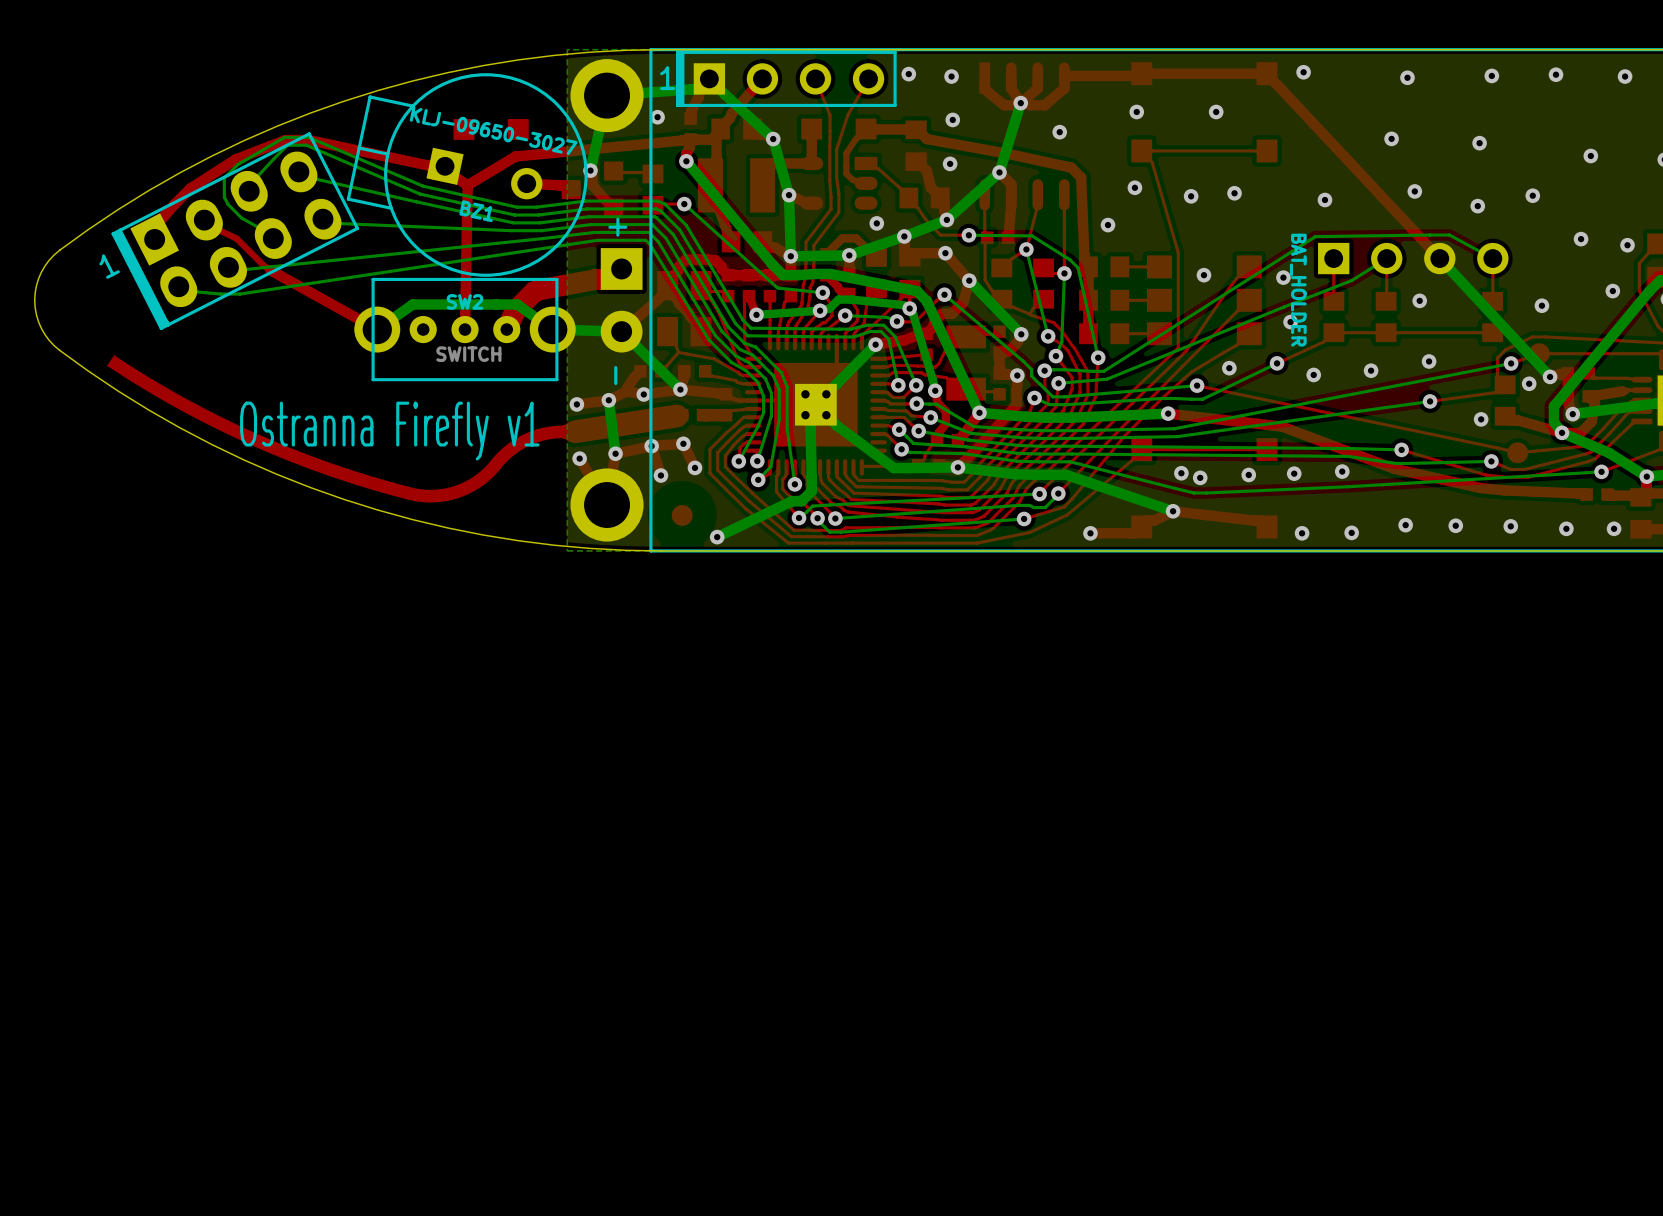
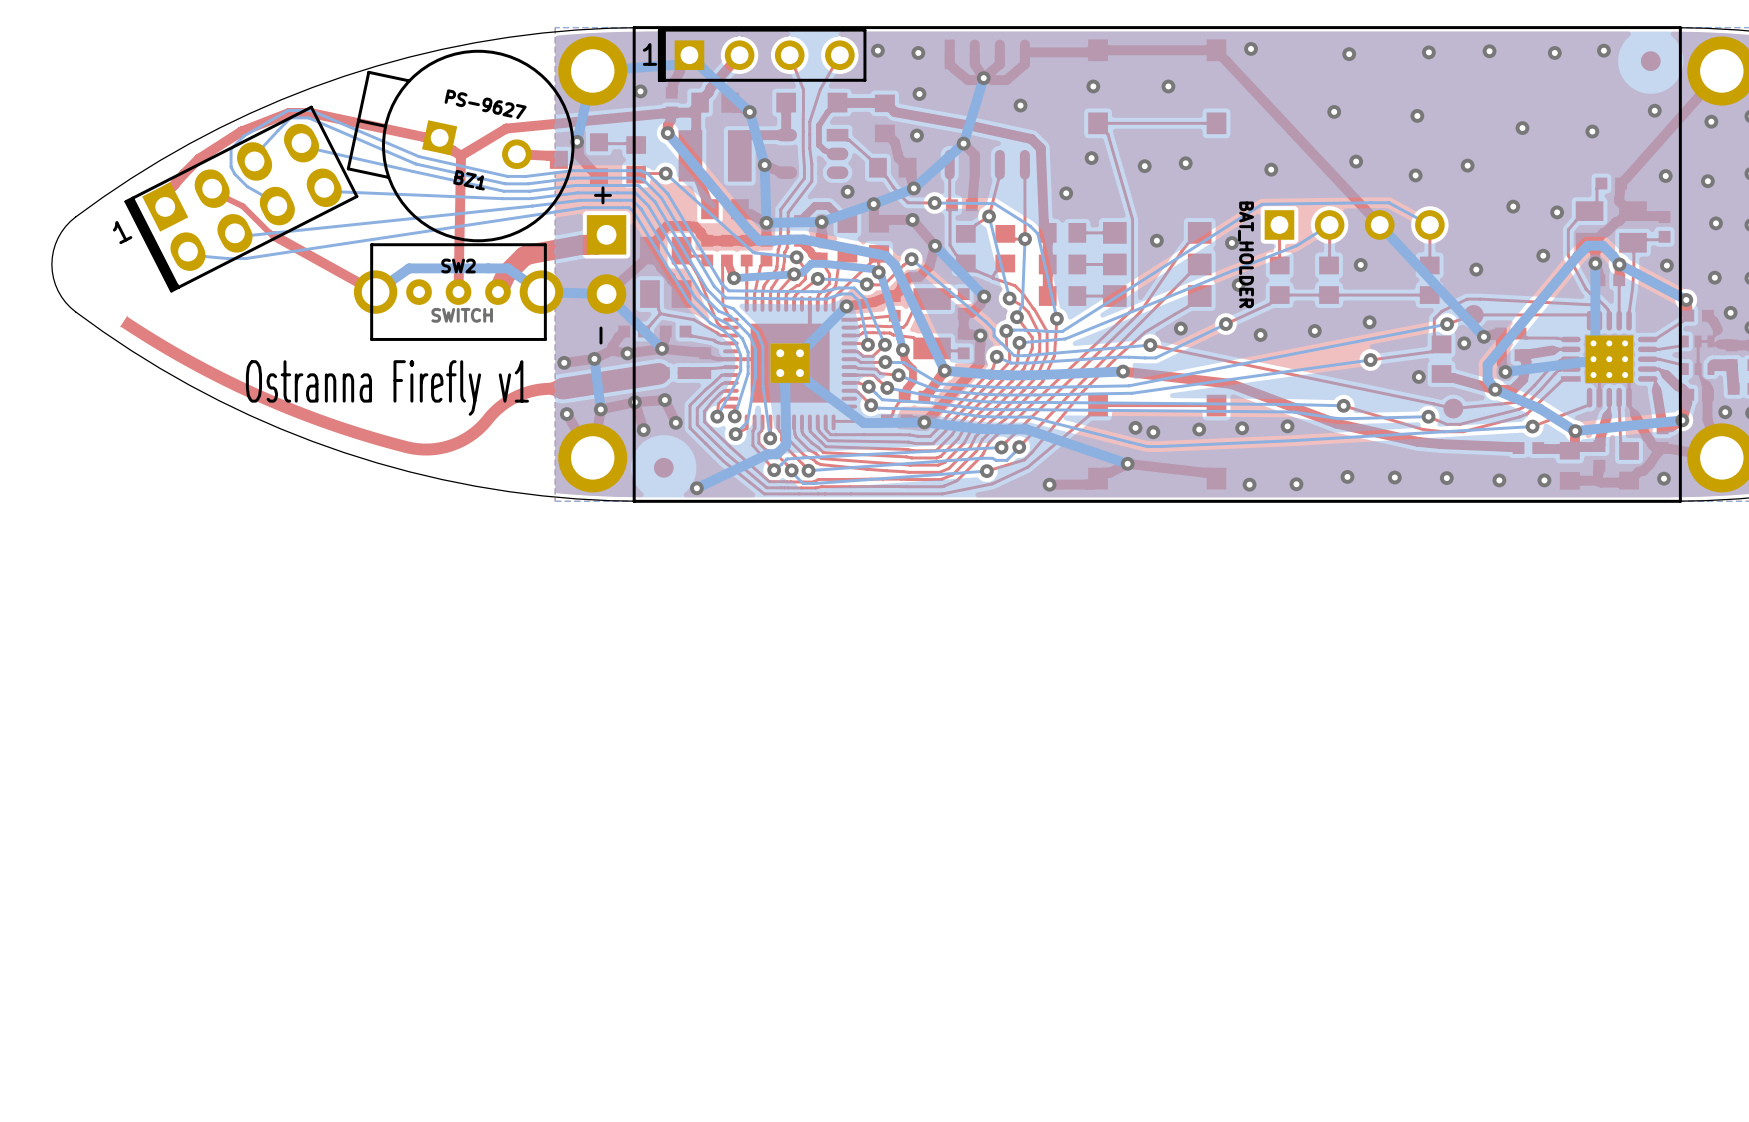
part: (491, 129) -> none
BZ1 value: KLJ-09650-3027 (493, 130) -> PS-9627 (485, 104)

